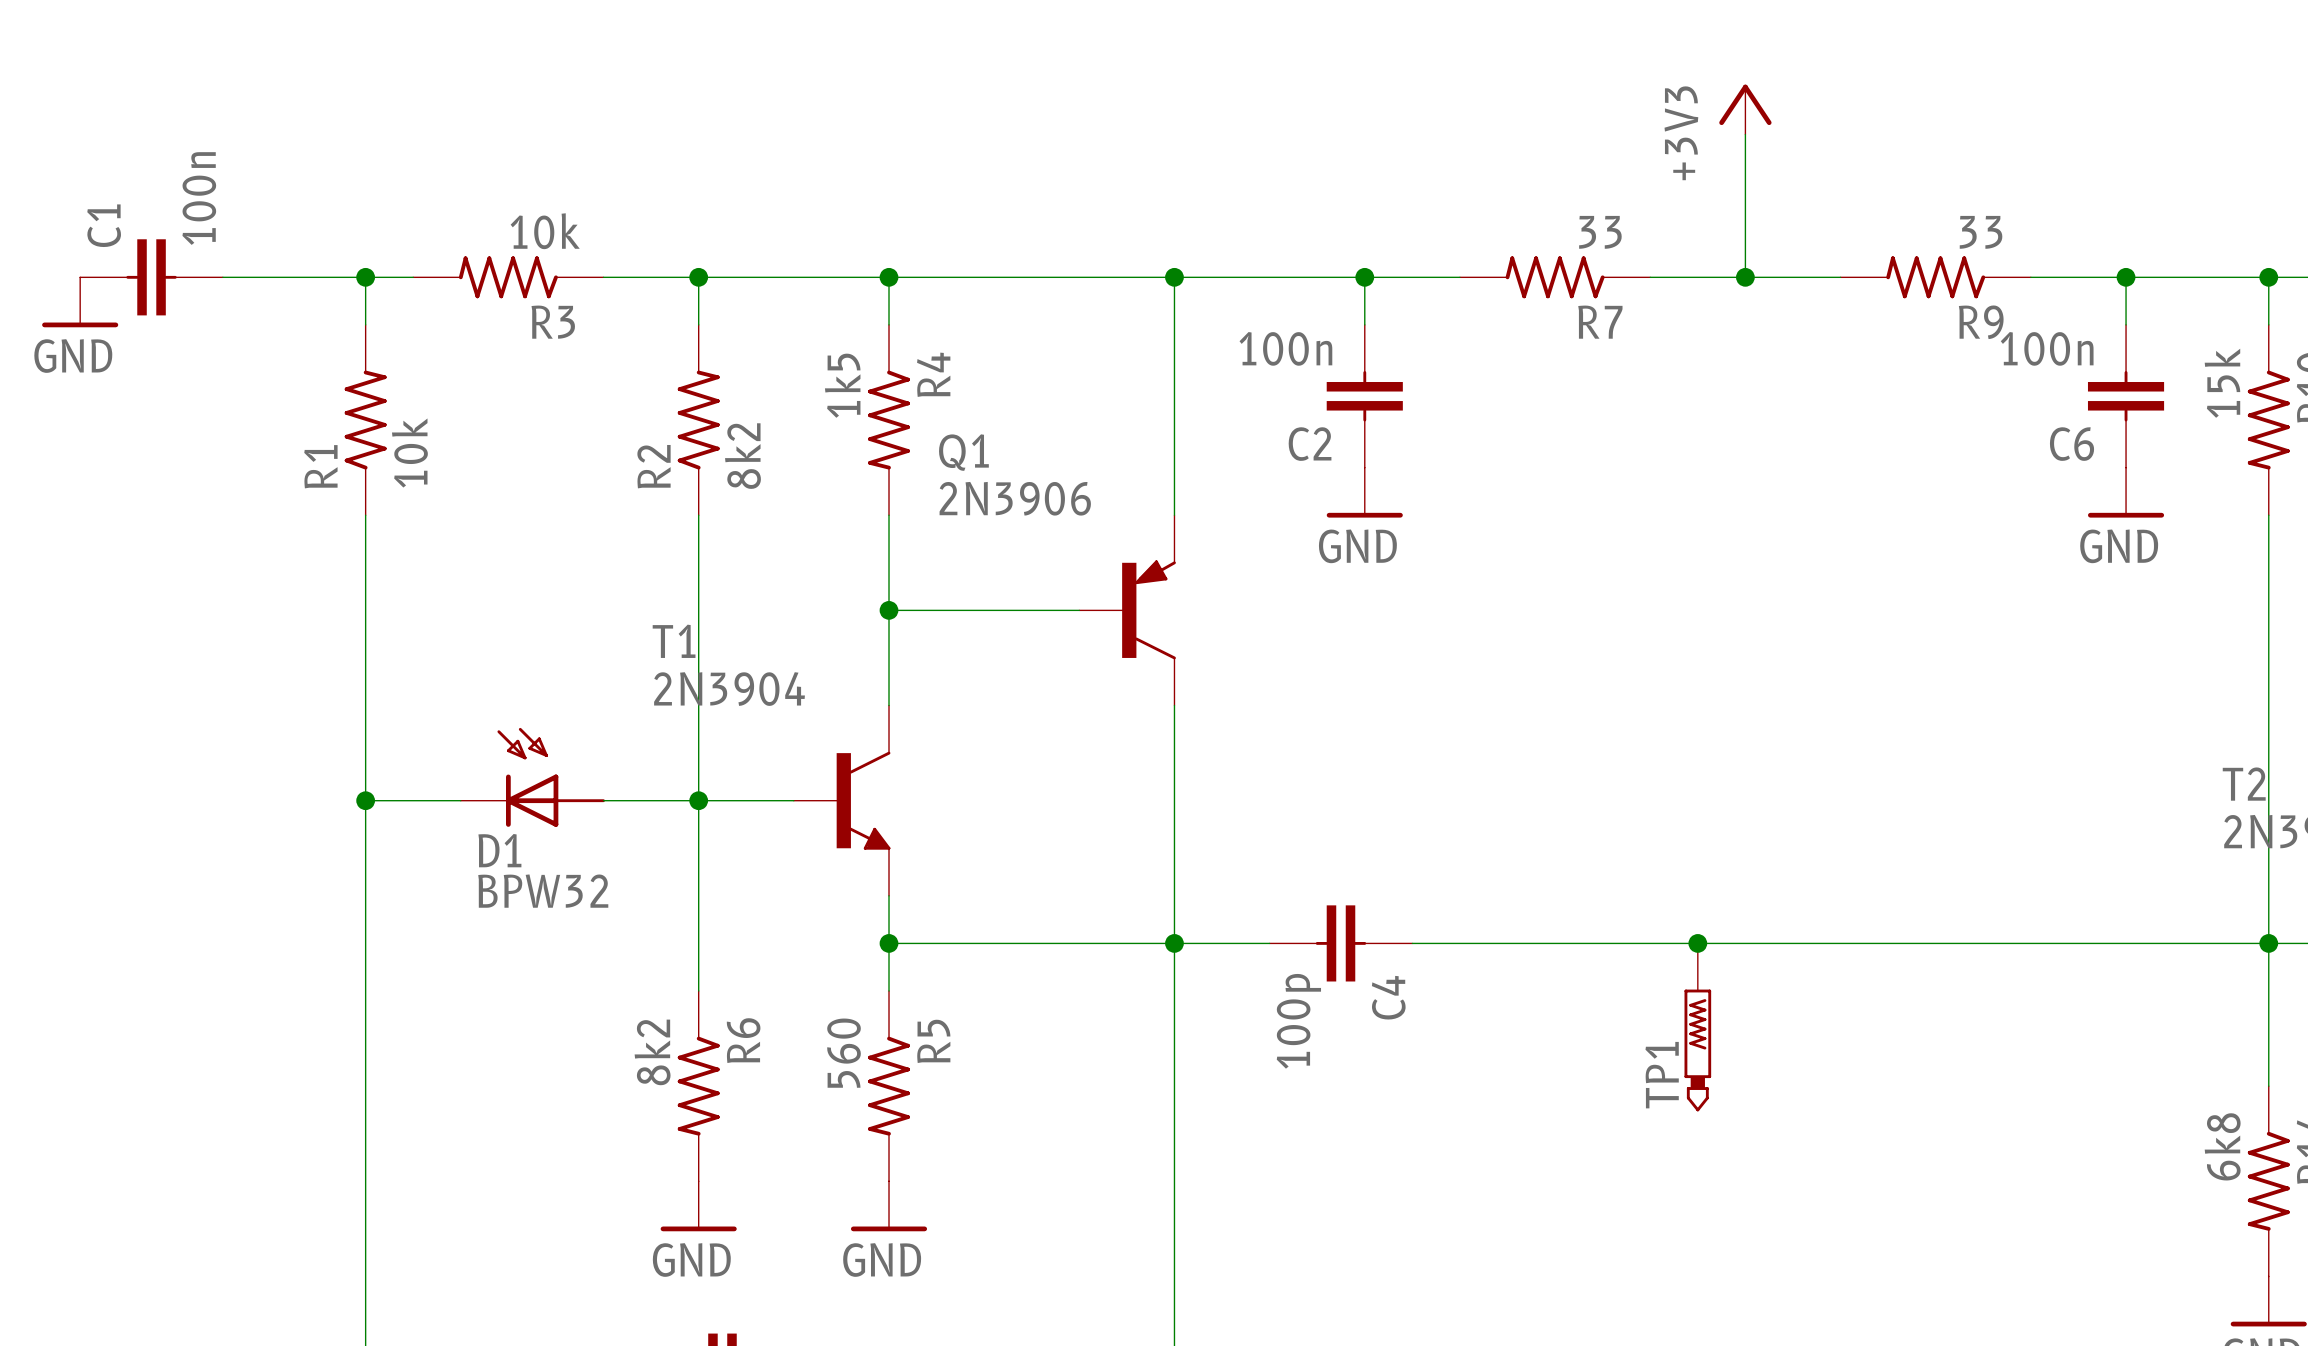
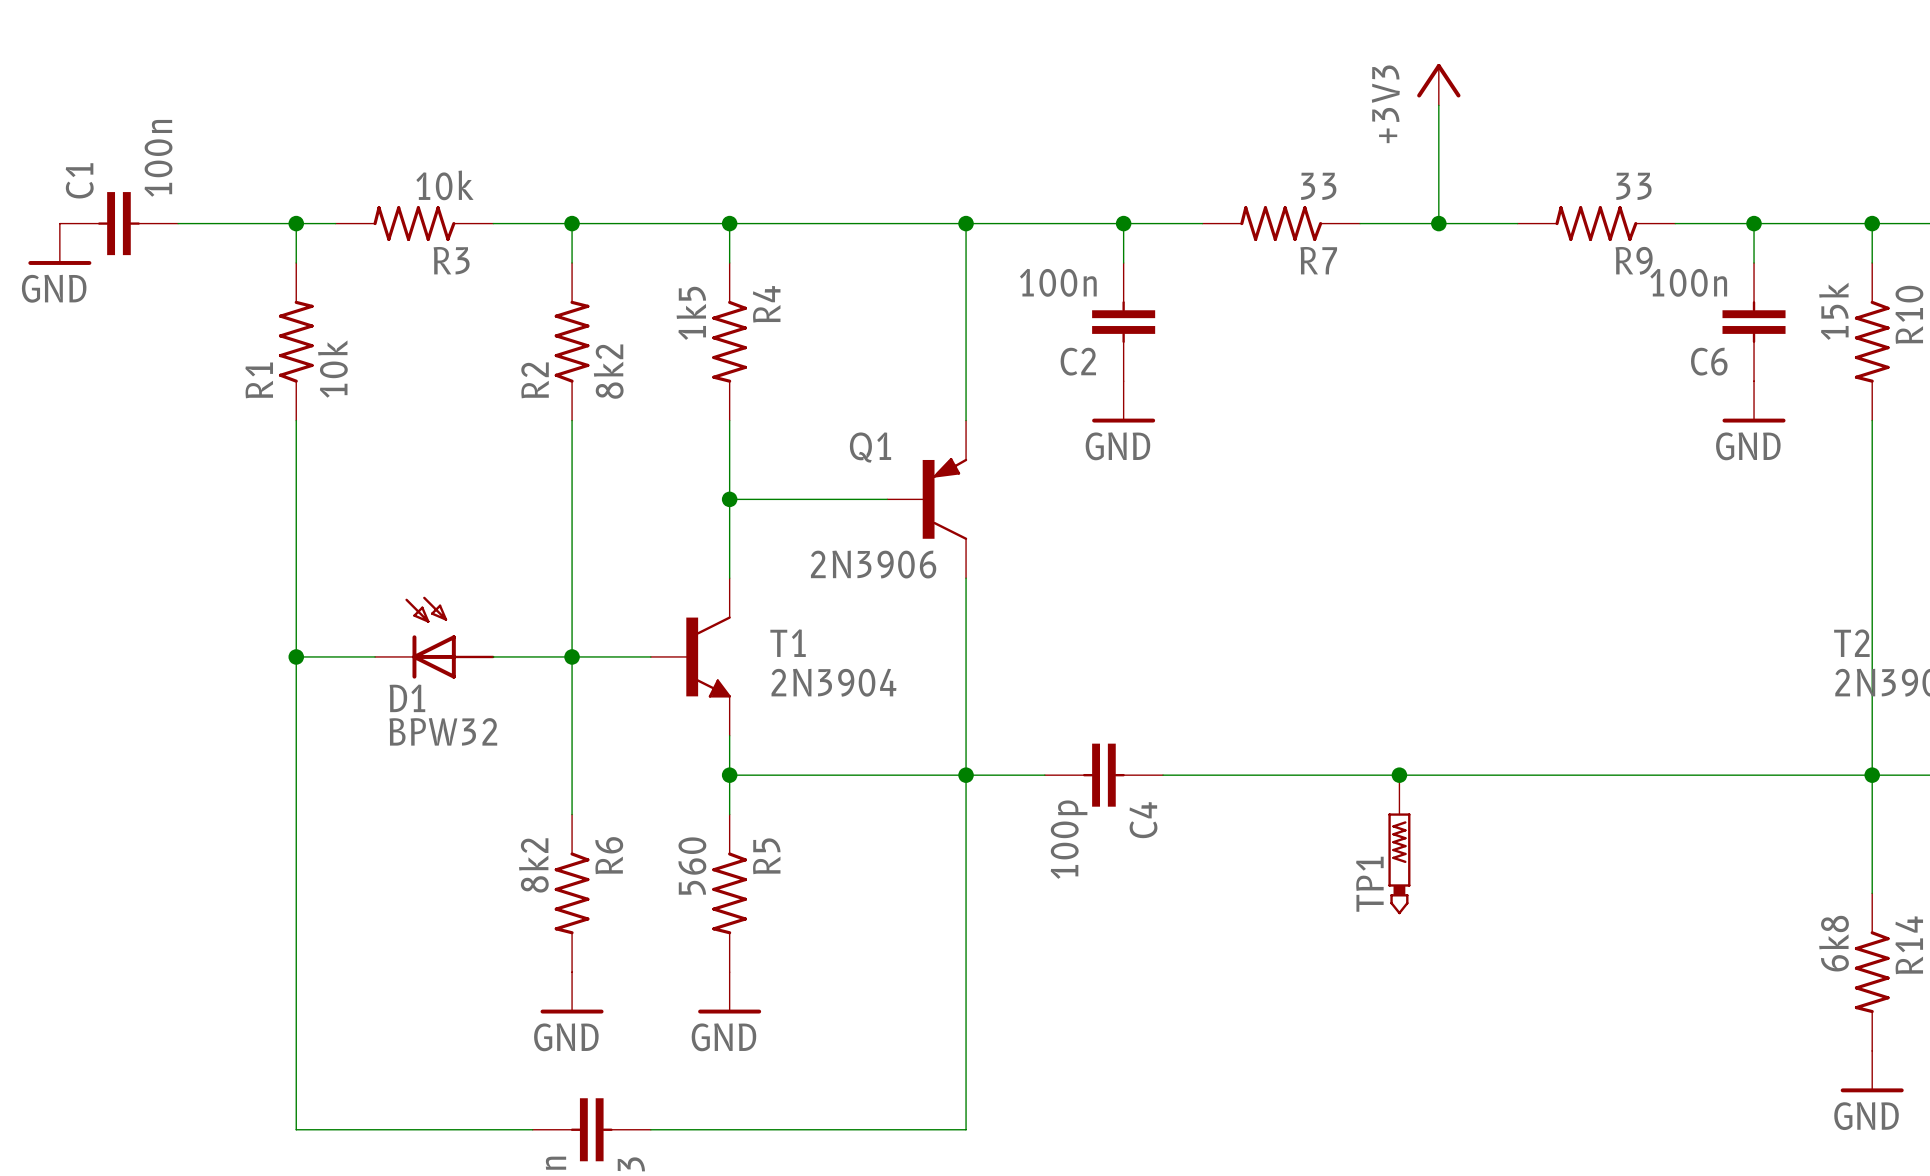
Q1 name position: Q1 (963, 452) -> Q1 (870, 447)
Q1 value position: 2N3906 (1015, 498) -> 2N3906 (873, 564)
T1 name position: T1 (674, 641) -> T1 (788, 643)
T1 value position: 2N3904 (729, 689) -> 2N3904 (833, 682)

